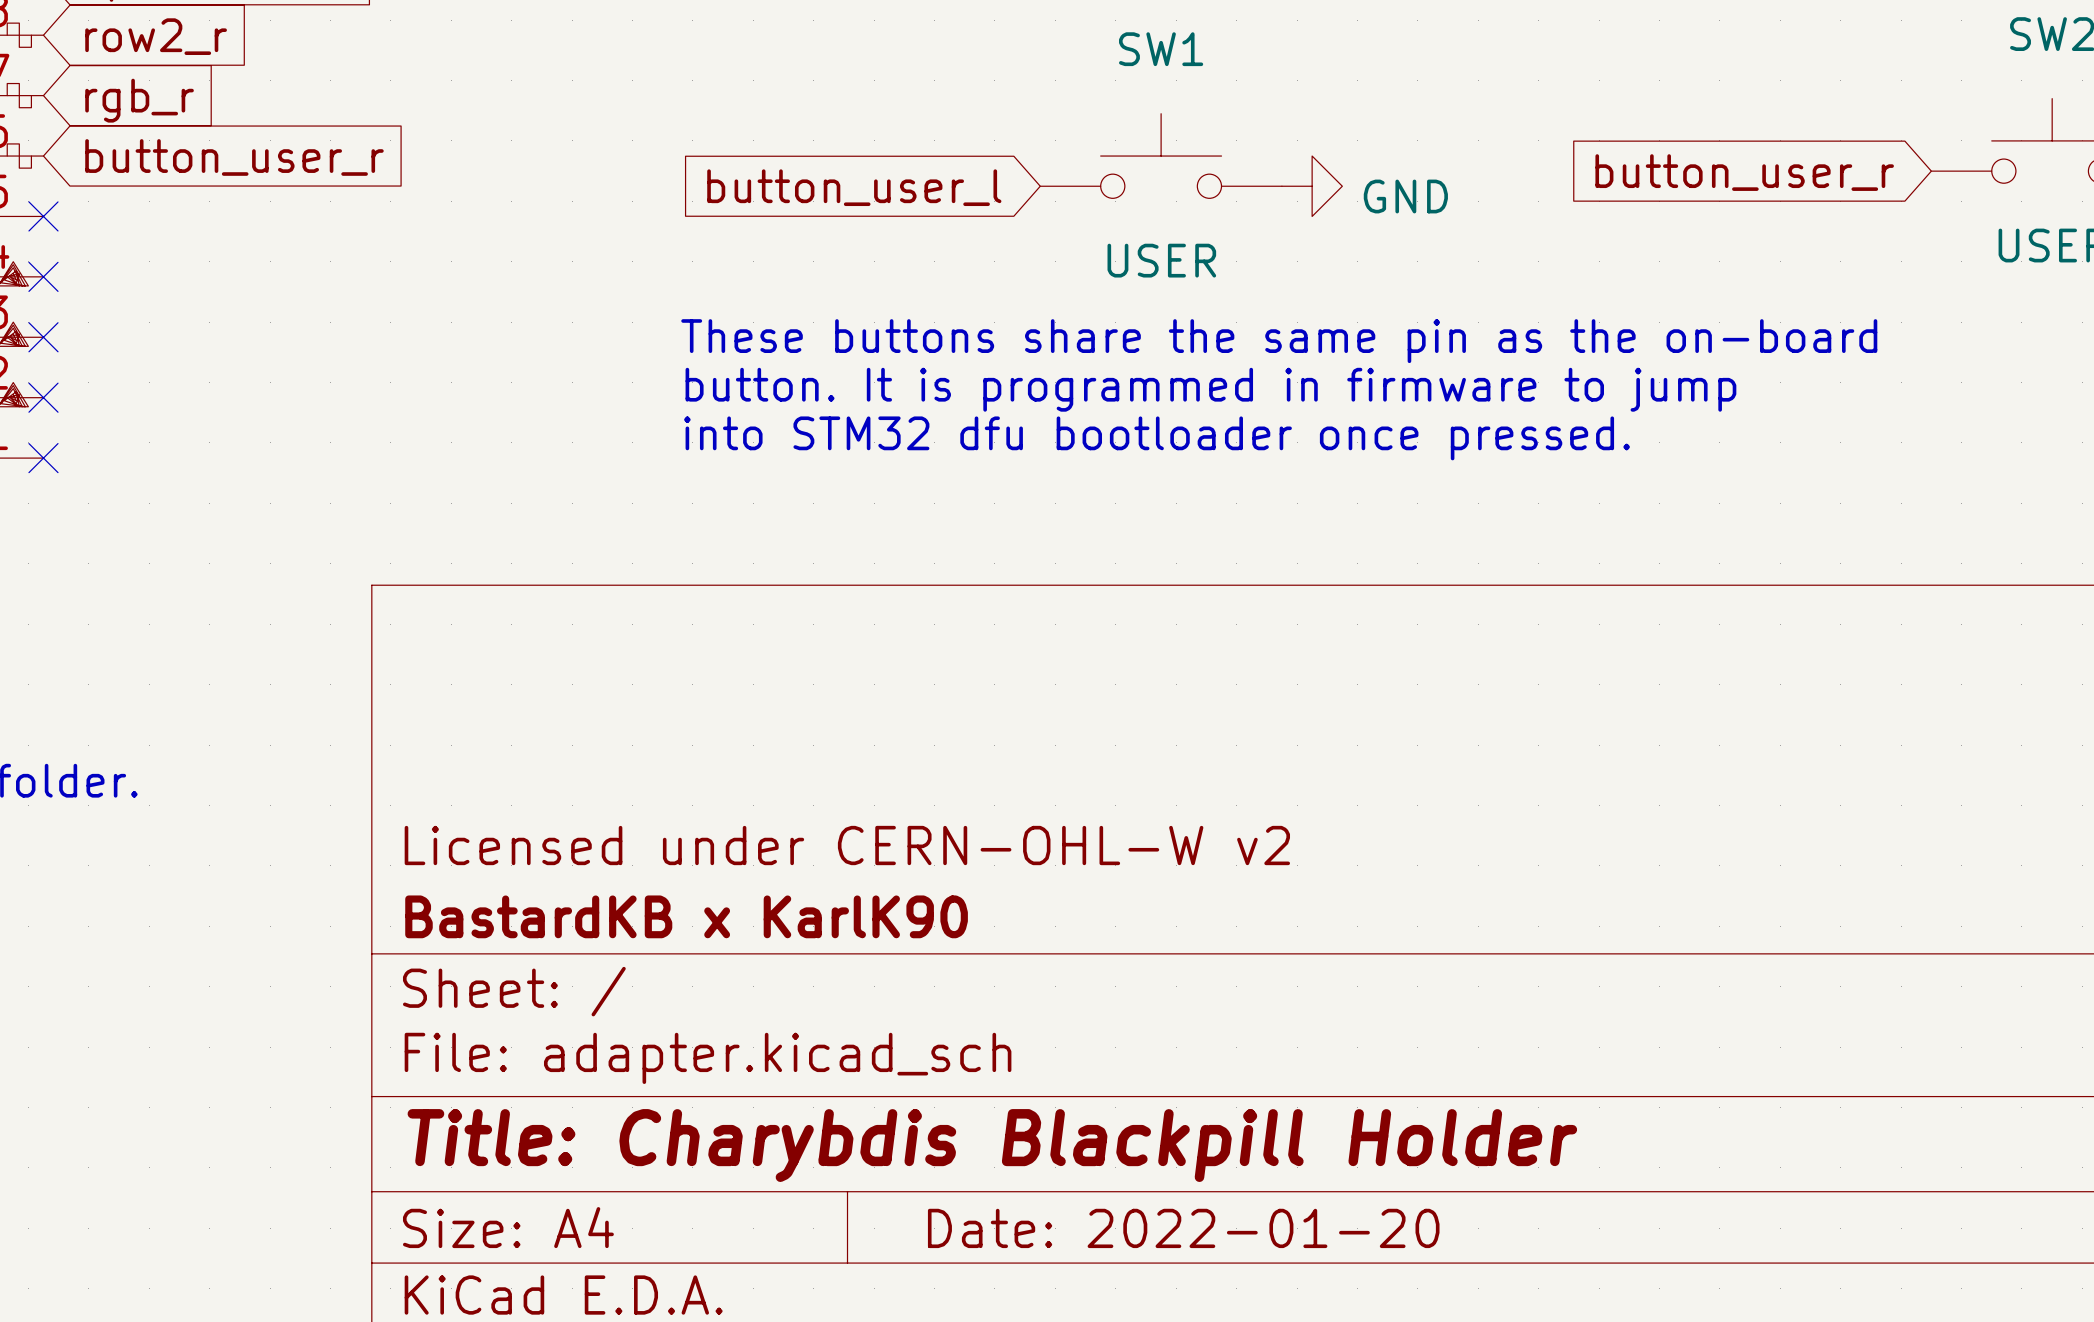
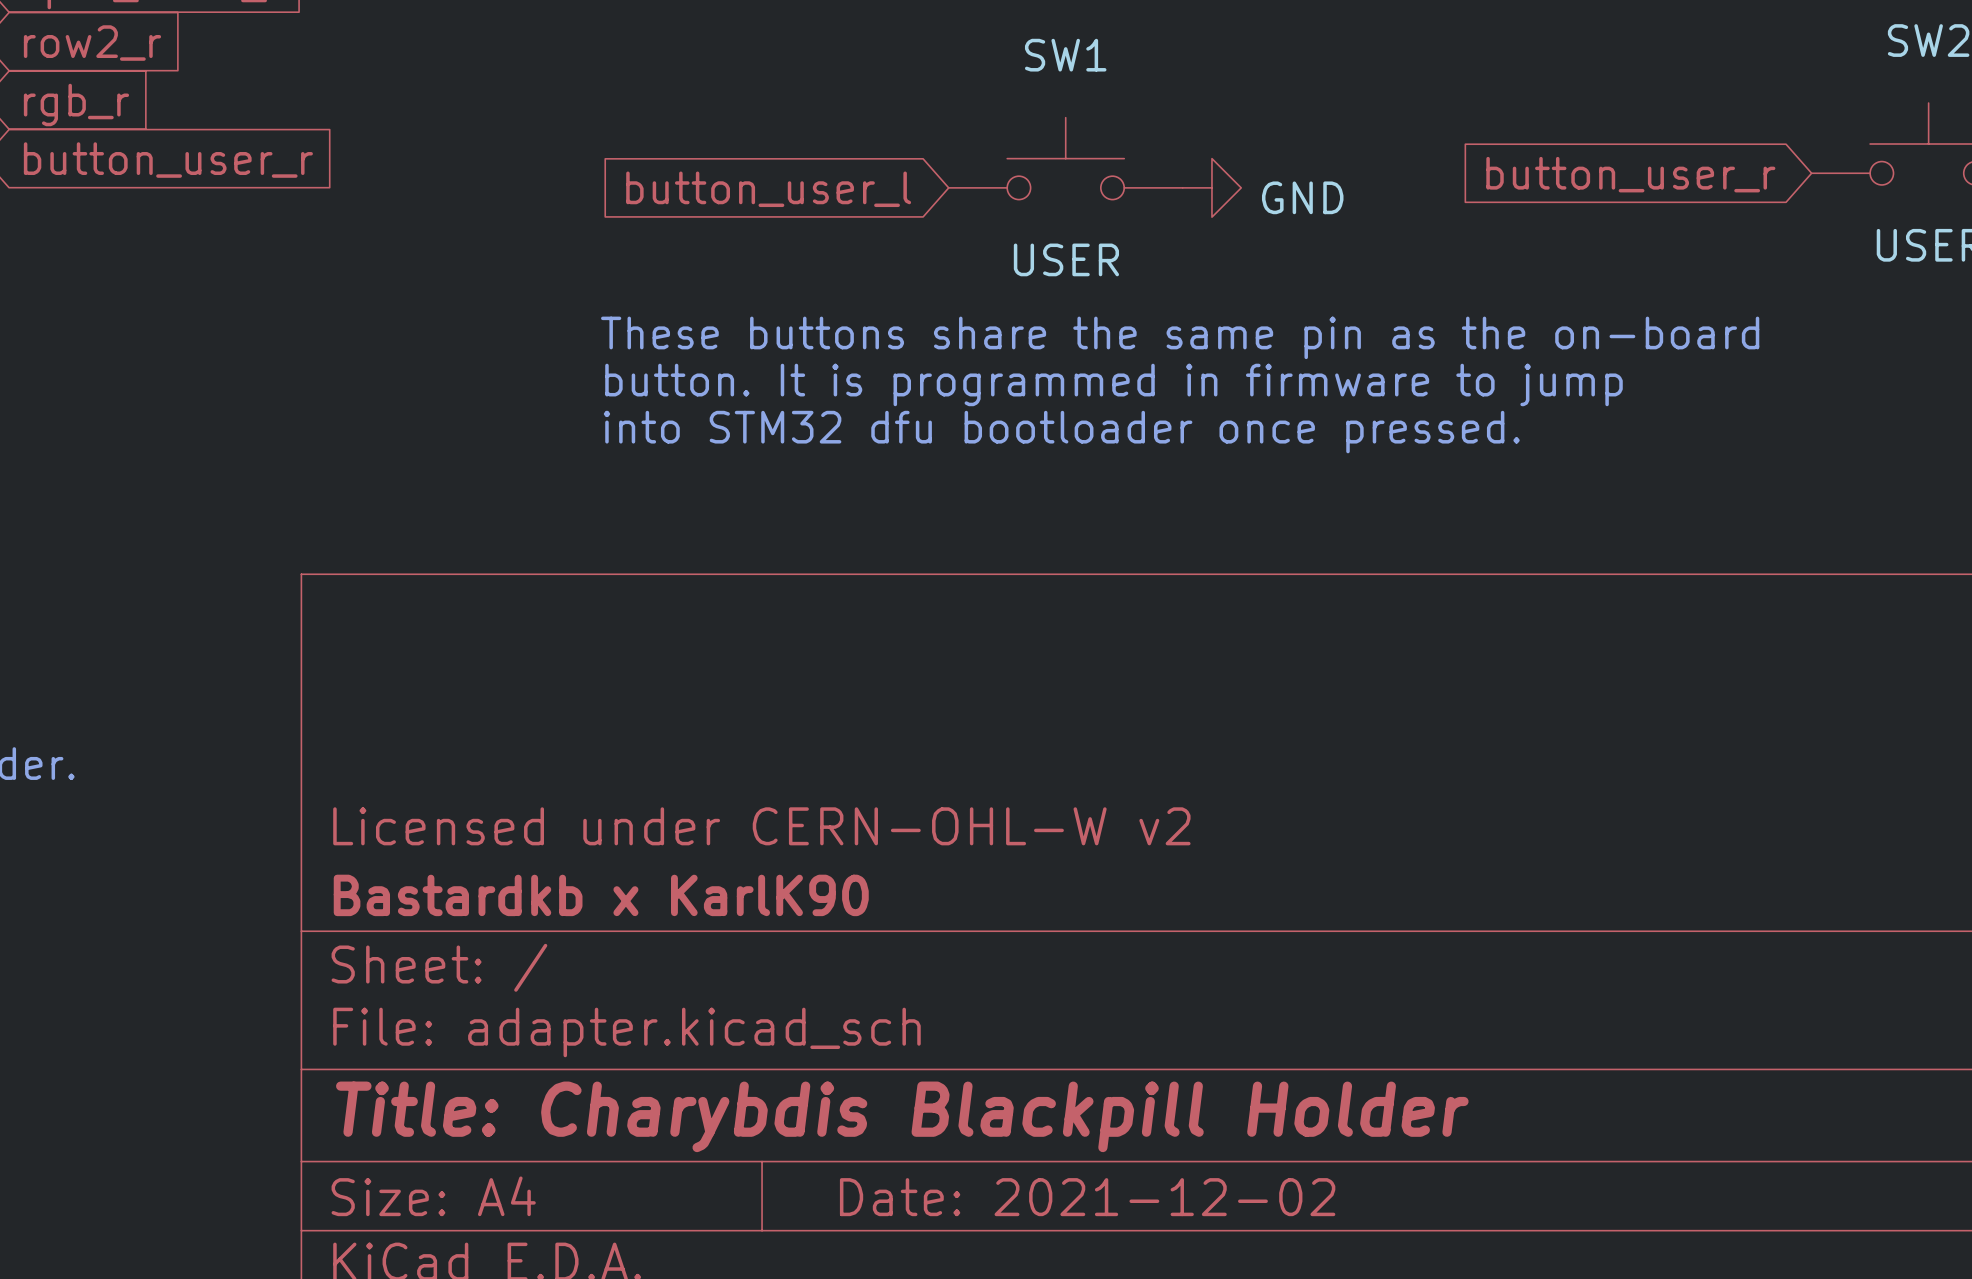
title block: BastardKB x KarlK90 (686, 916) -> Bastardkb x KarlK90 (601, 895)
title block: Date: 2022-01-20 (1183, 1228) -> Date: 2021-12-02 (1087, 1197)

